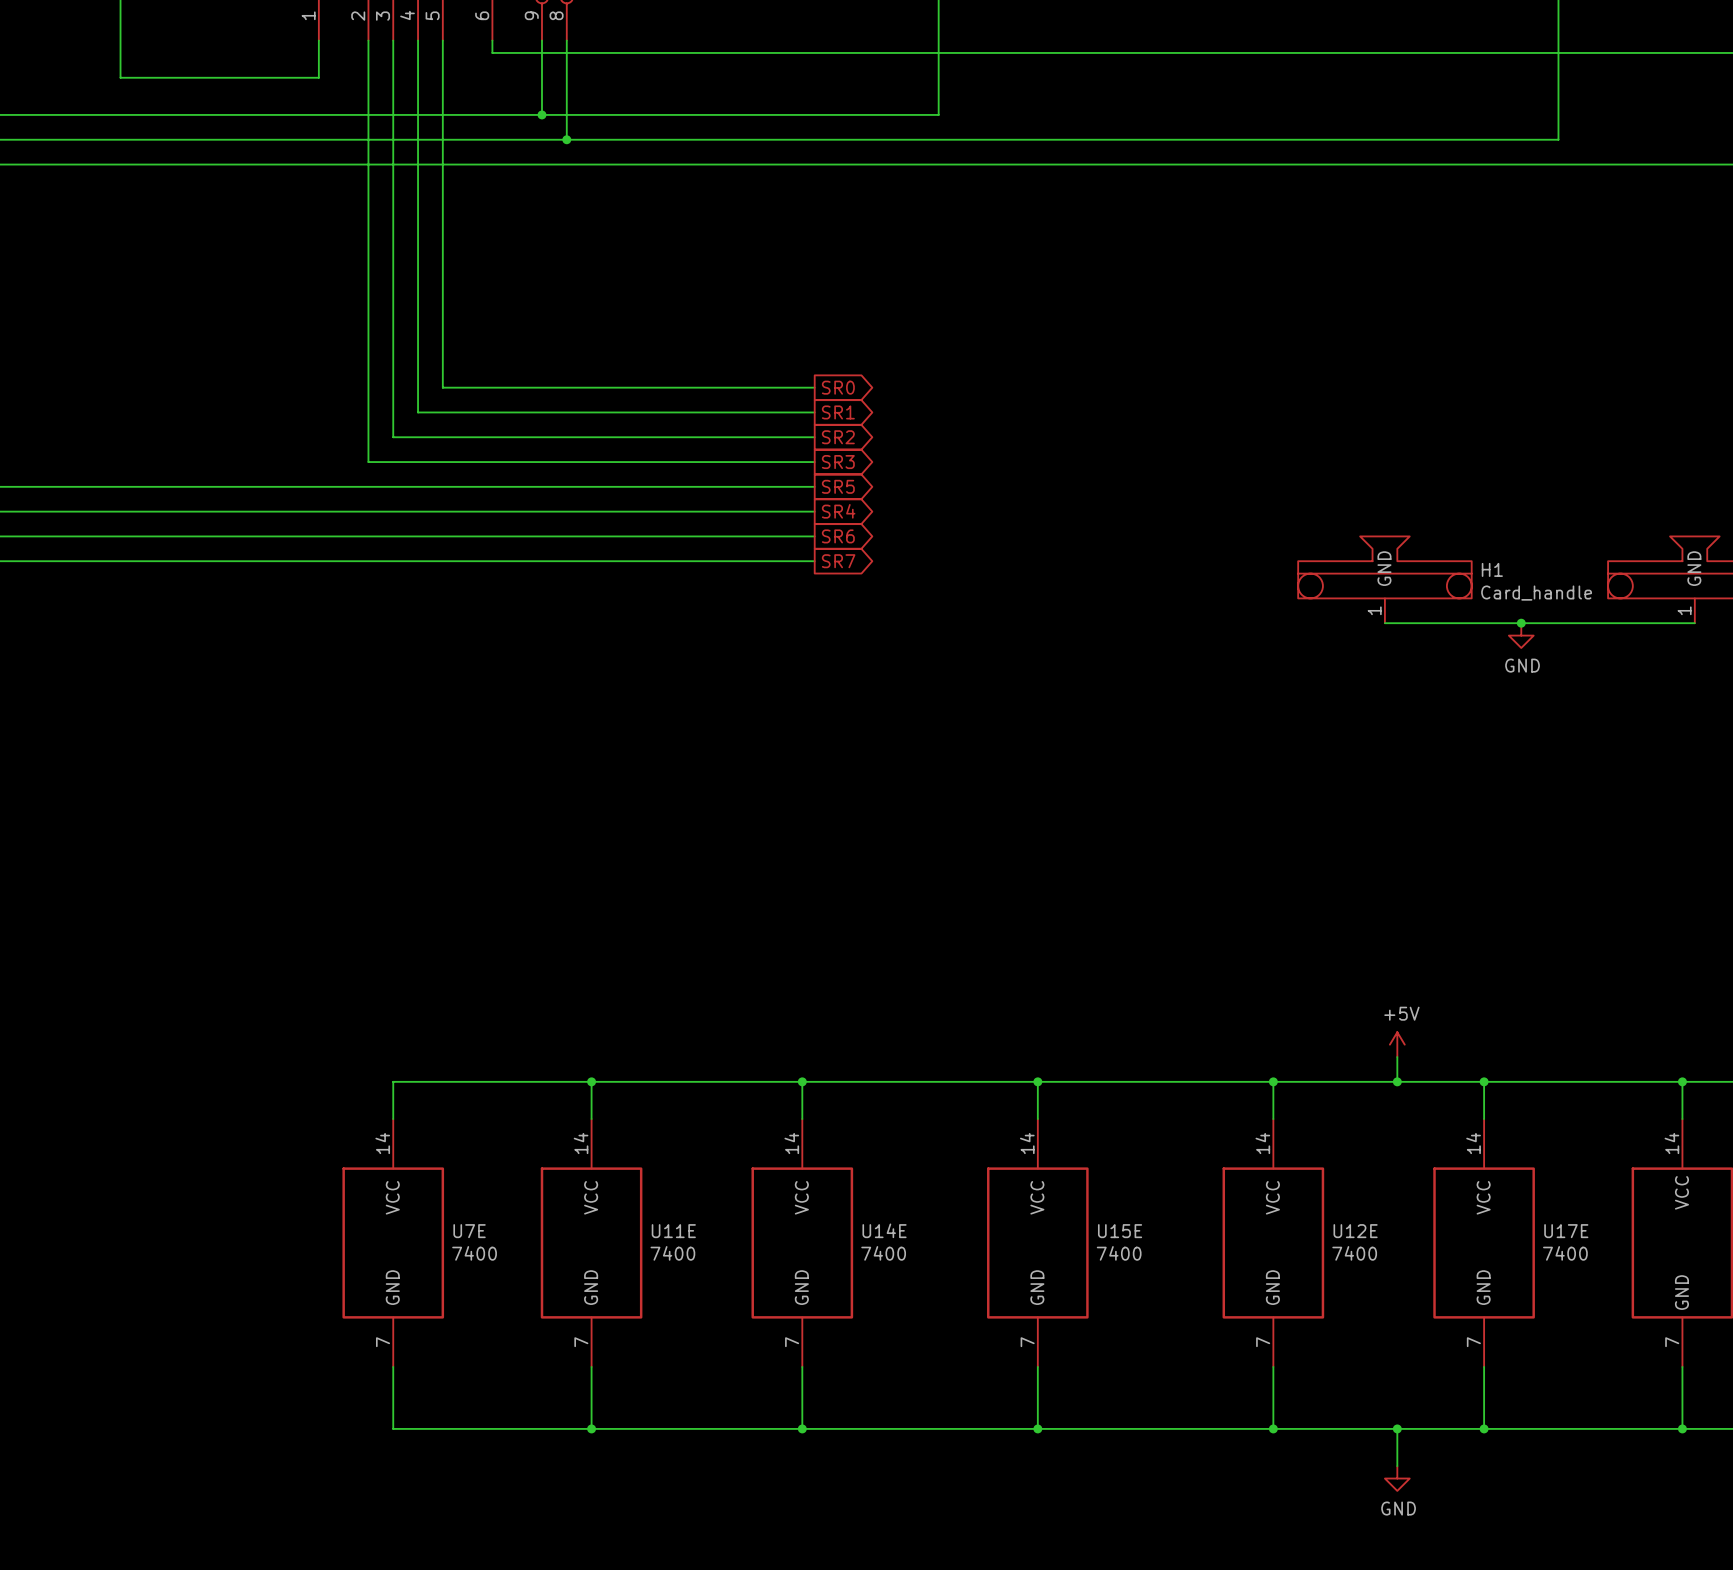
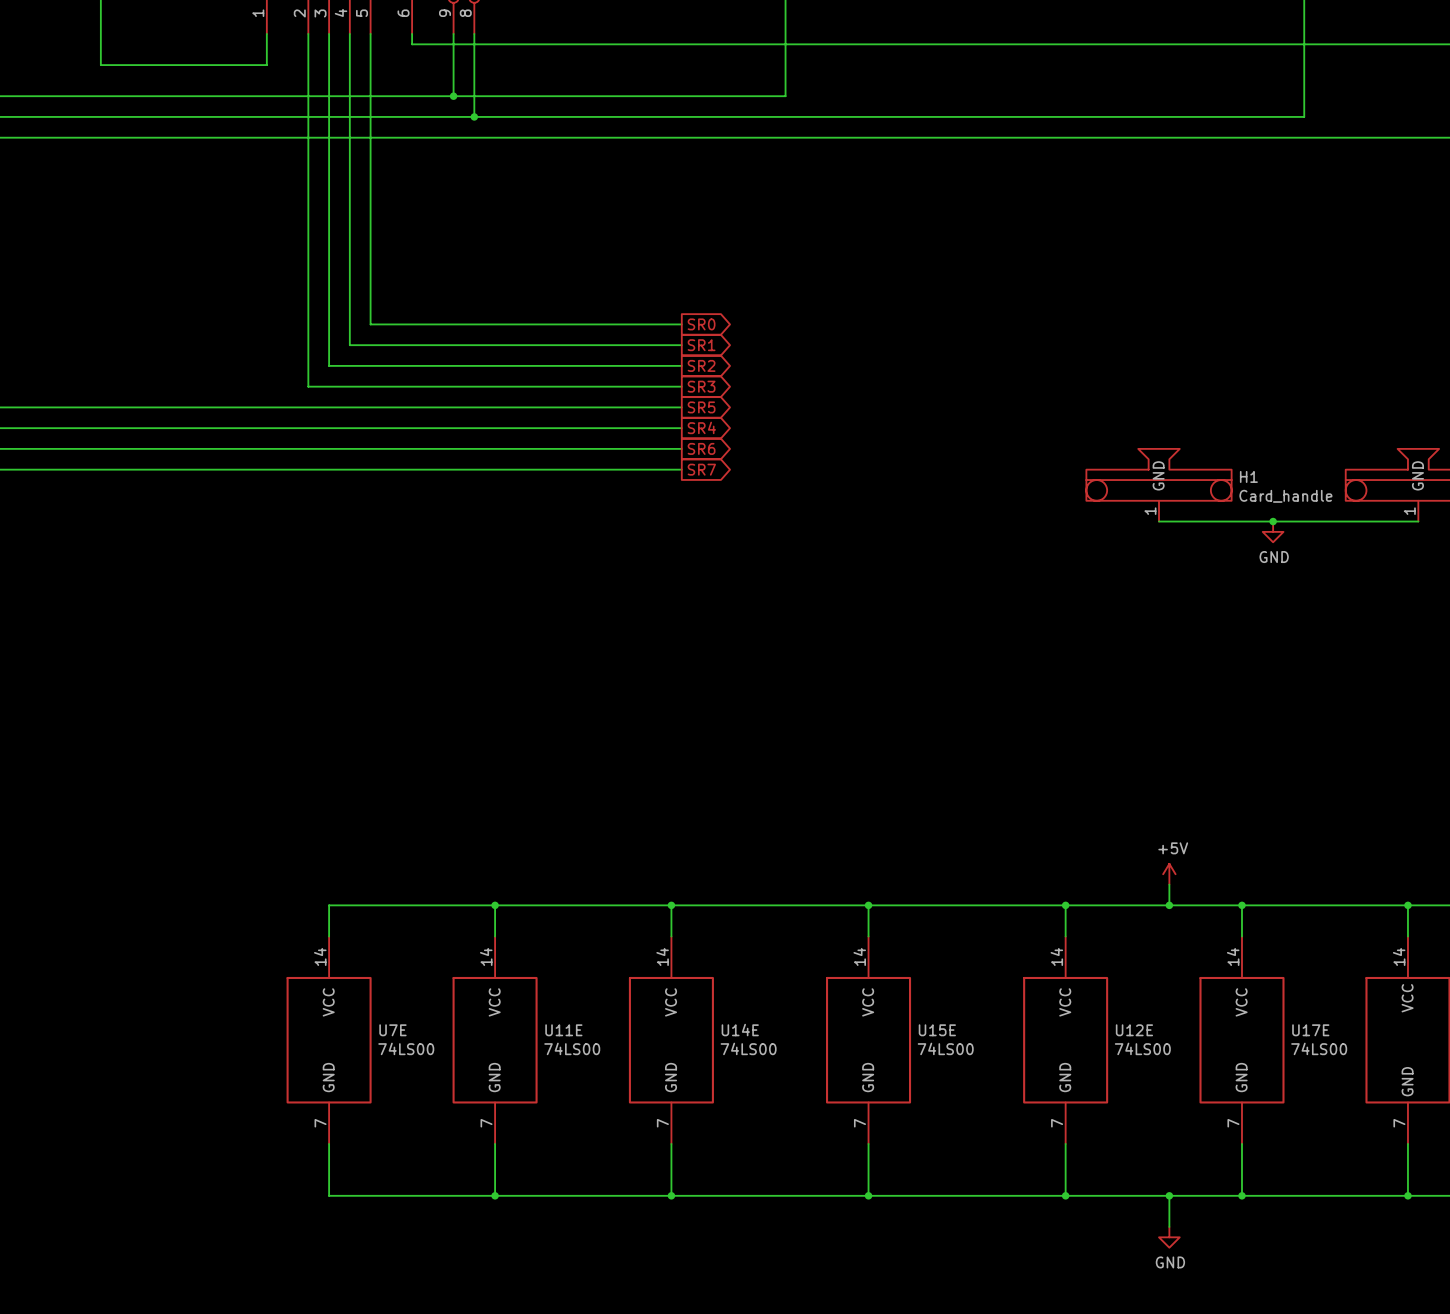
U7E value: 7400 (474, 1253) -> 74LS00 (406, 1048)
U11E value: 7400 (672, 1253) -> 74LS00 (572, 1048)
U14E value: 7400 (883, 1253) -> 74LS00 (748, 1048)
U15E value: 7400 (1119, 1253) -> 74LS00 (945, 1048)
U12E value: 7400 (1354, 1253) -> 74LS00 (1142, 1048)
U17E value: 7400 (1565, 1253) -> 74LS00 (1319, 1048)

